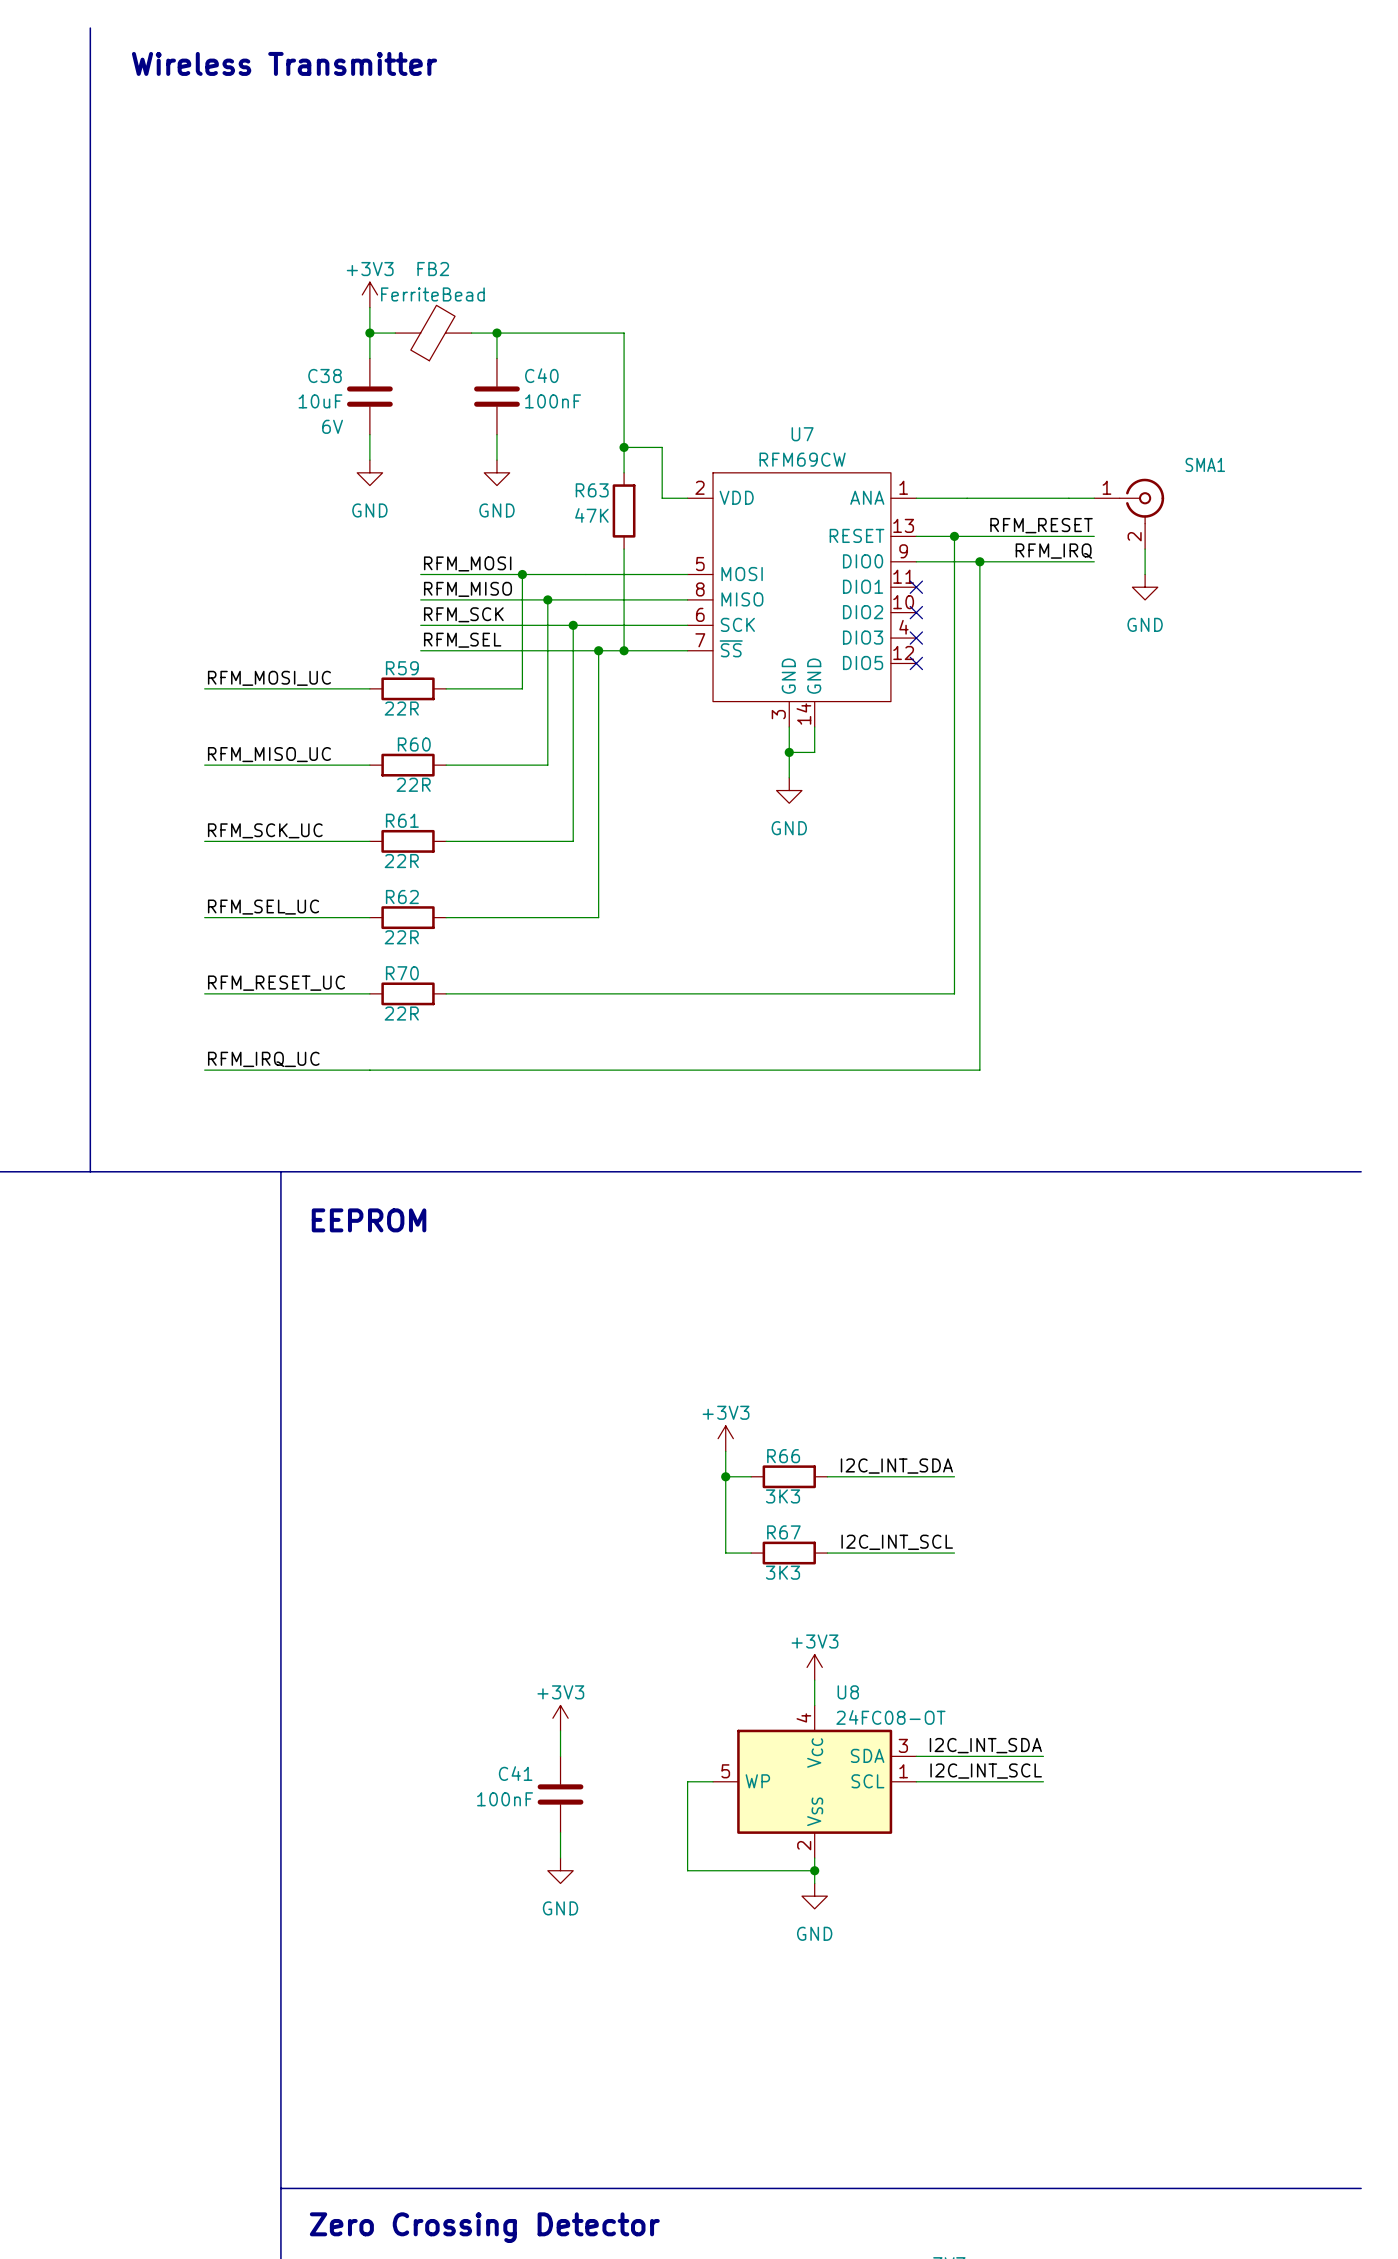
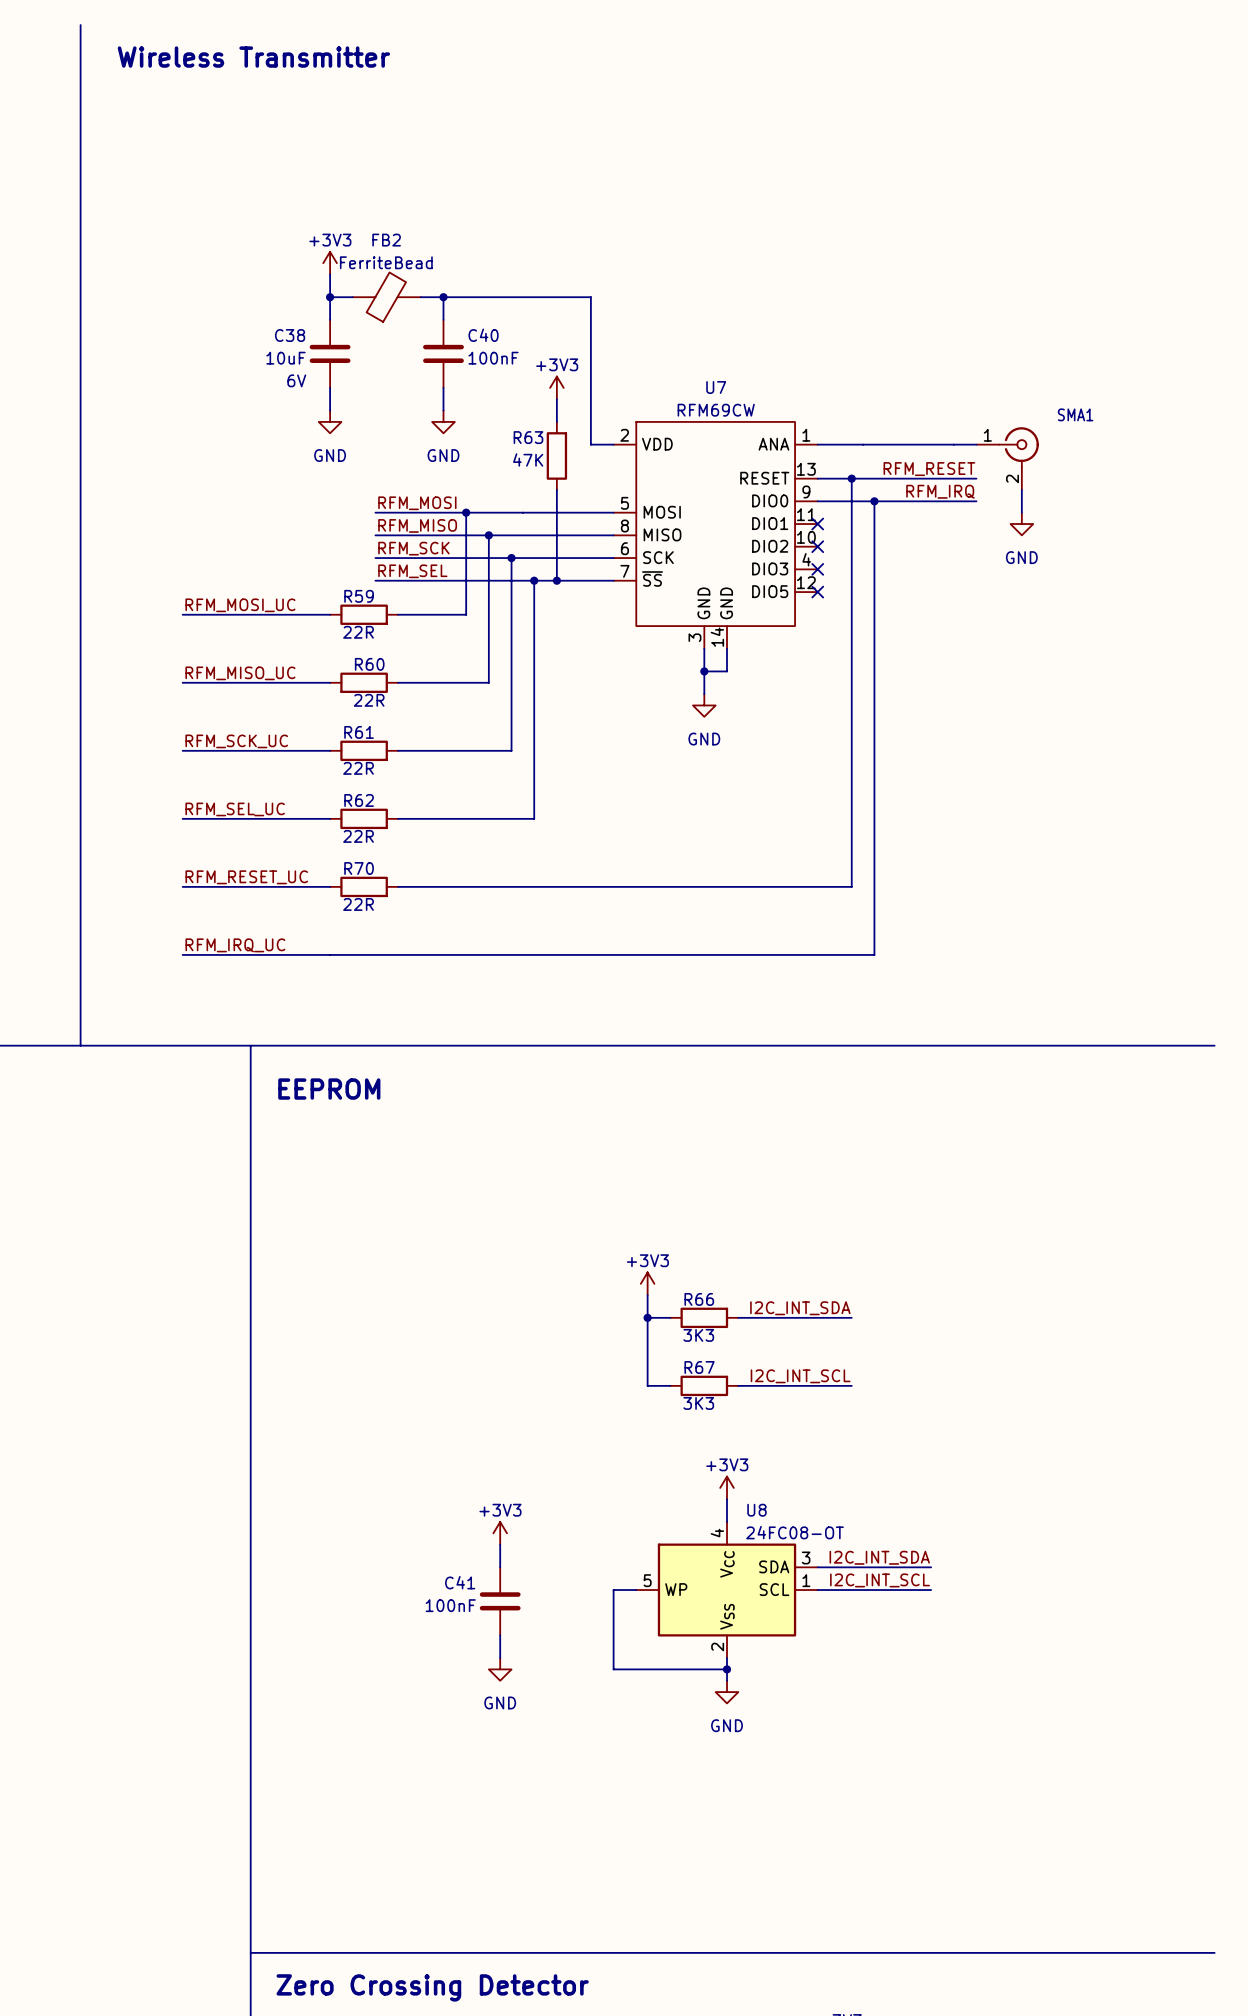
wire: (624, 333) (624, 447) (662, 447) -> (556, 297) (590, 297) (590, 399)
power symbol: none -> +3V3 (556, 387)
junction: (624, 447) -> none

